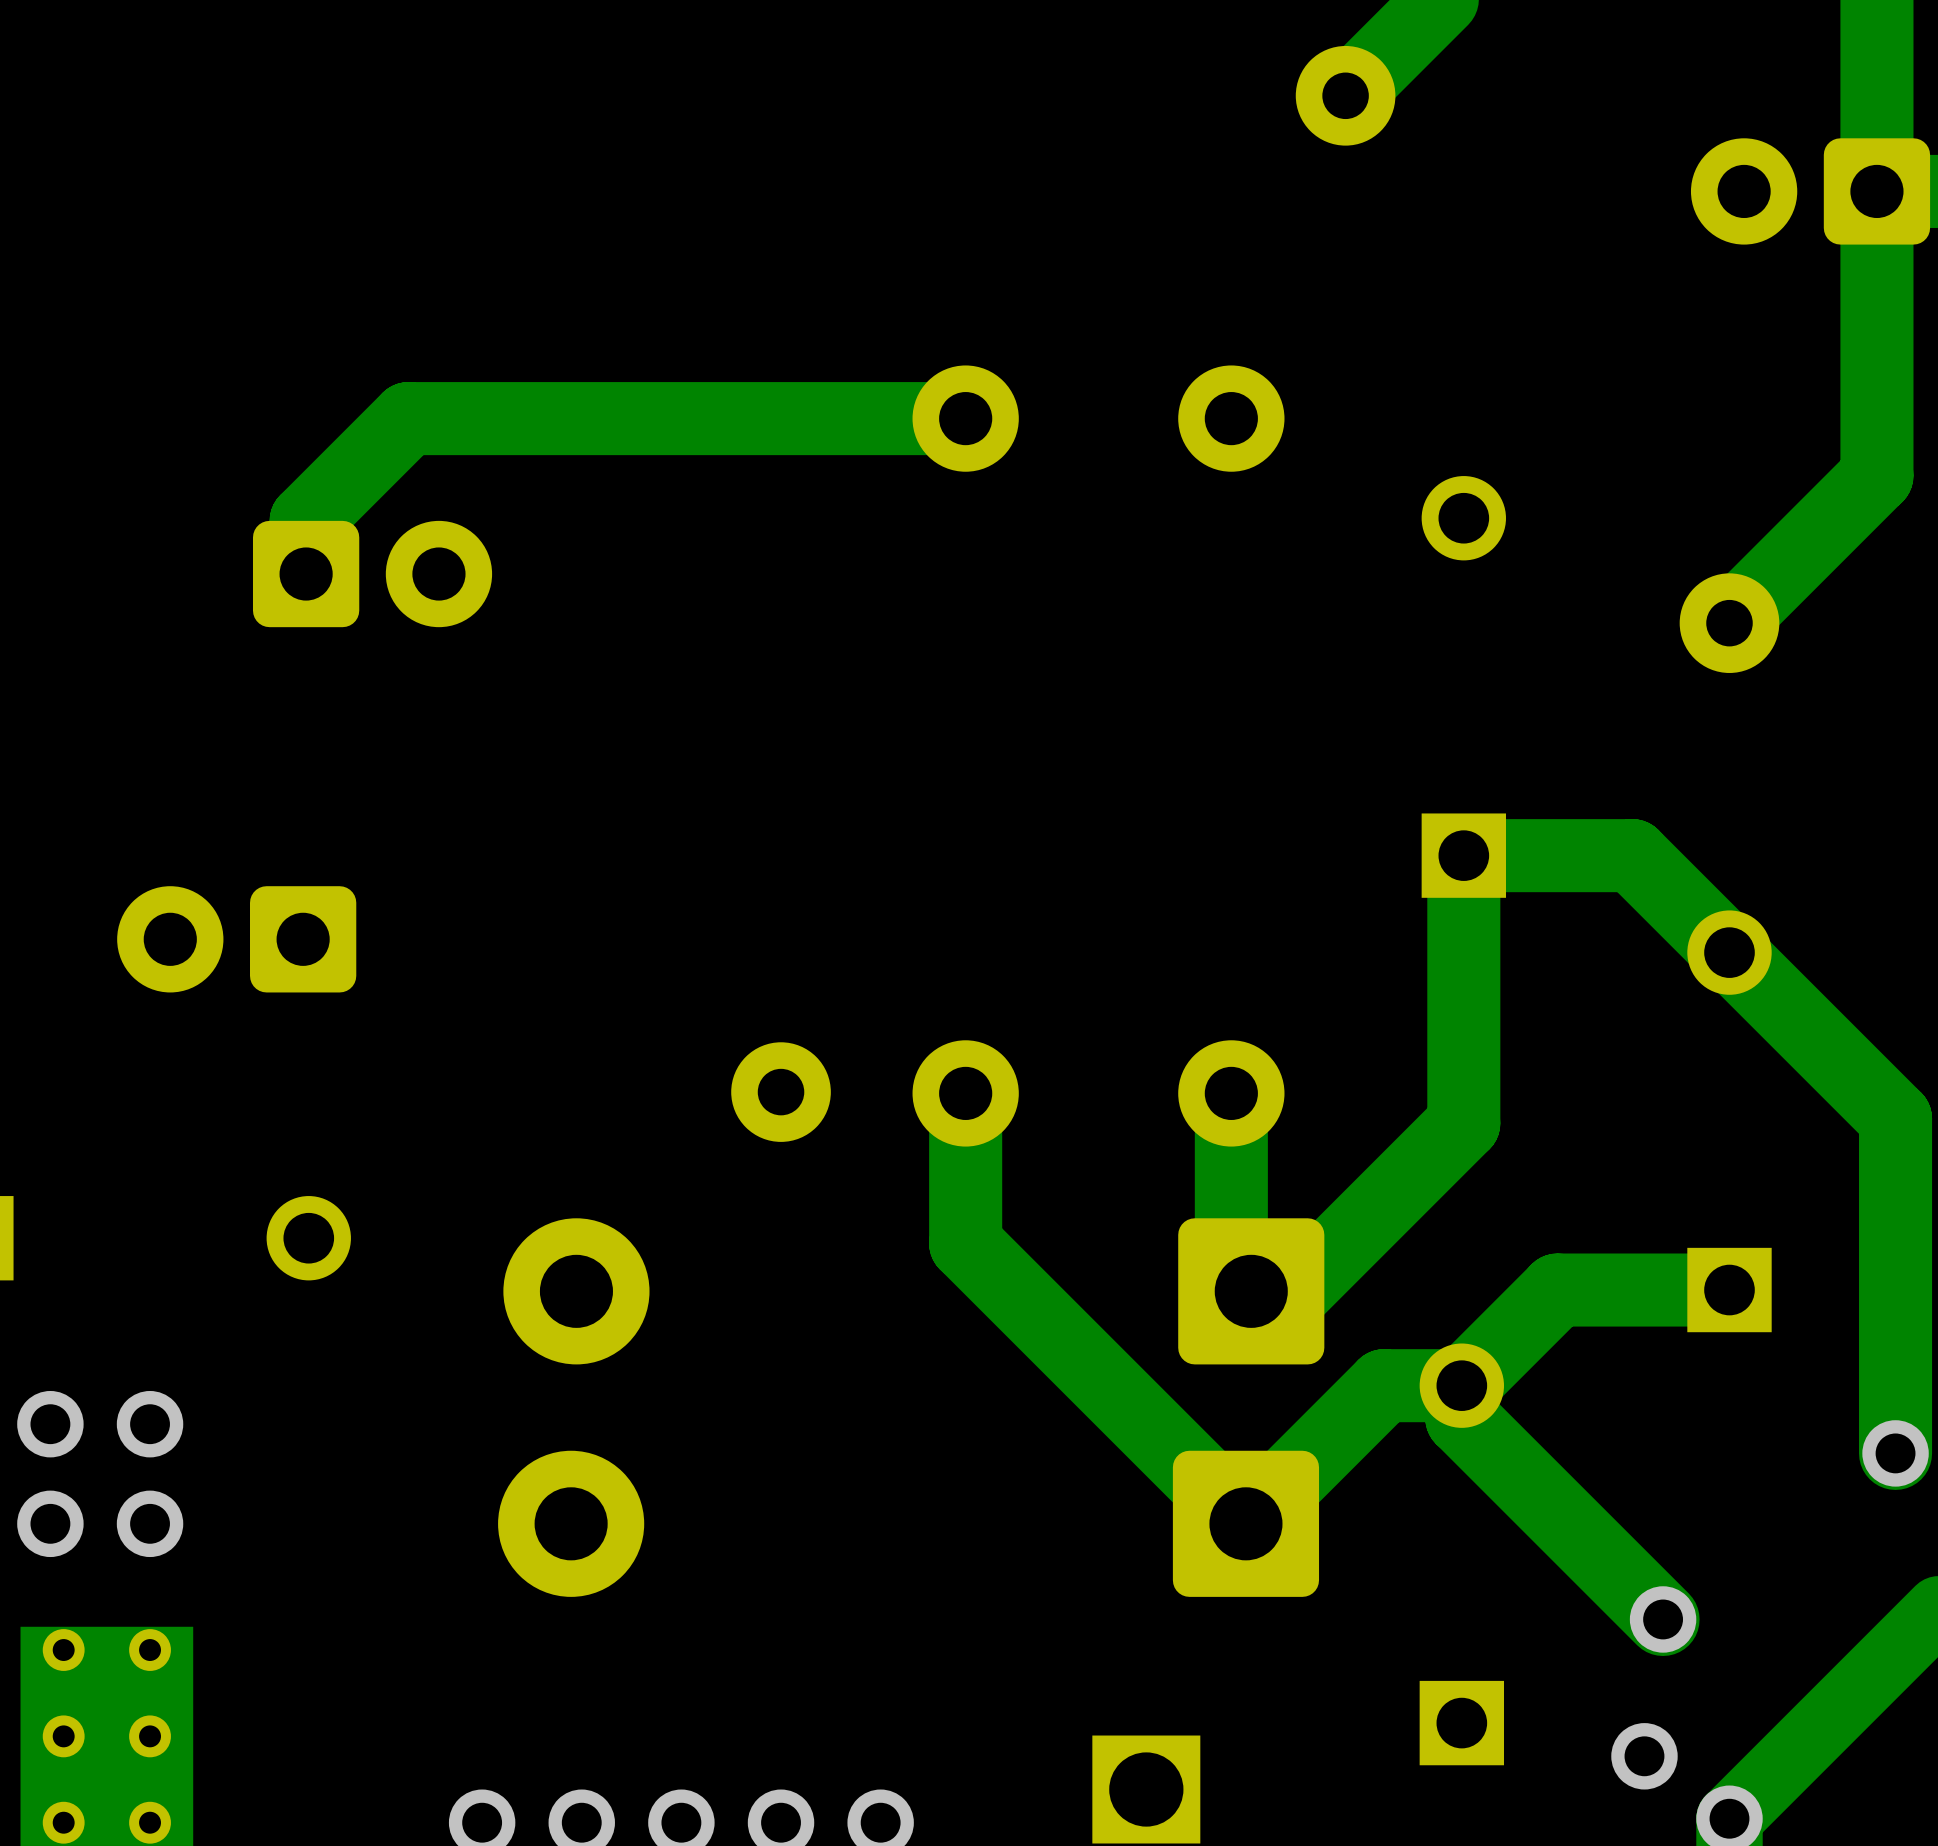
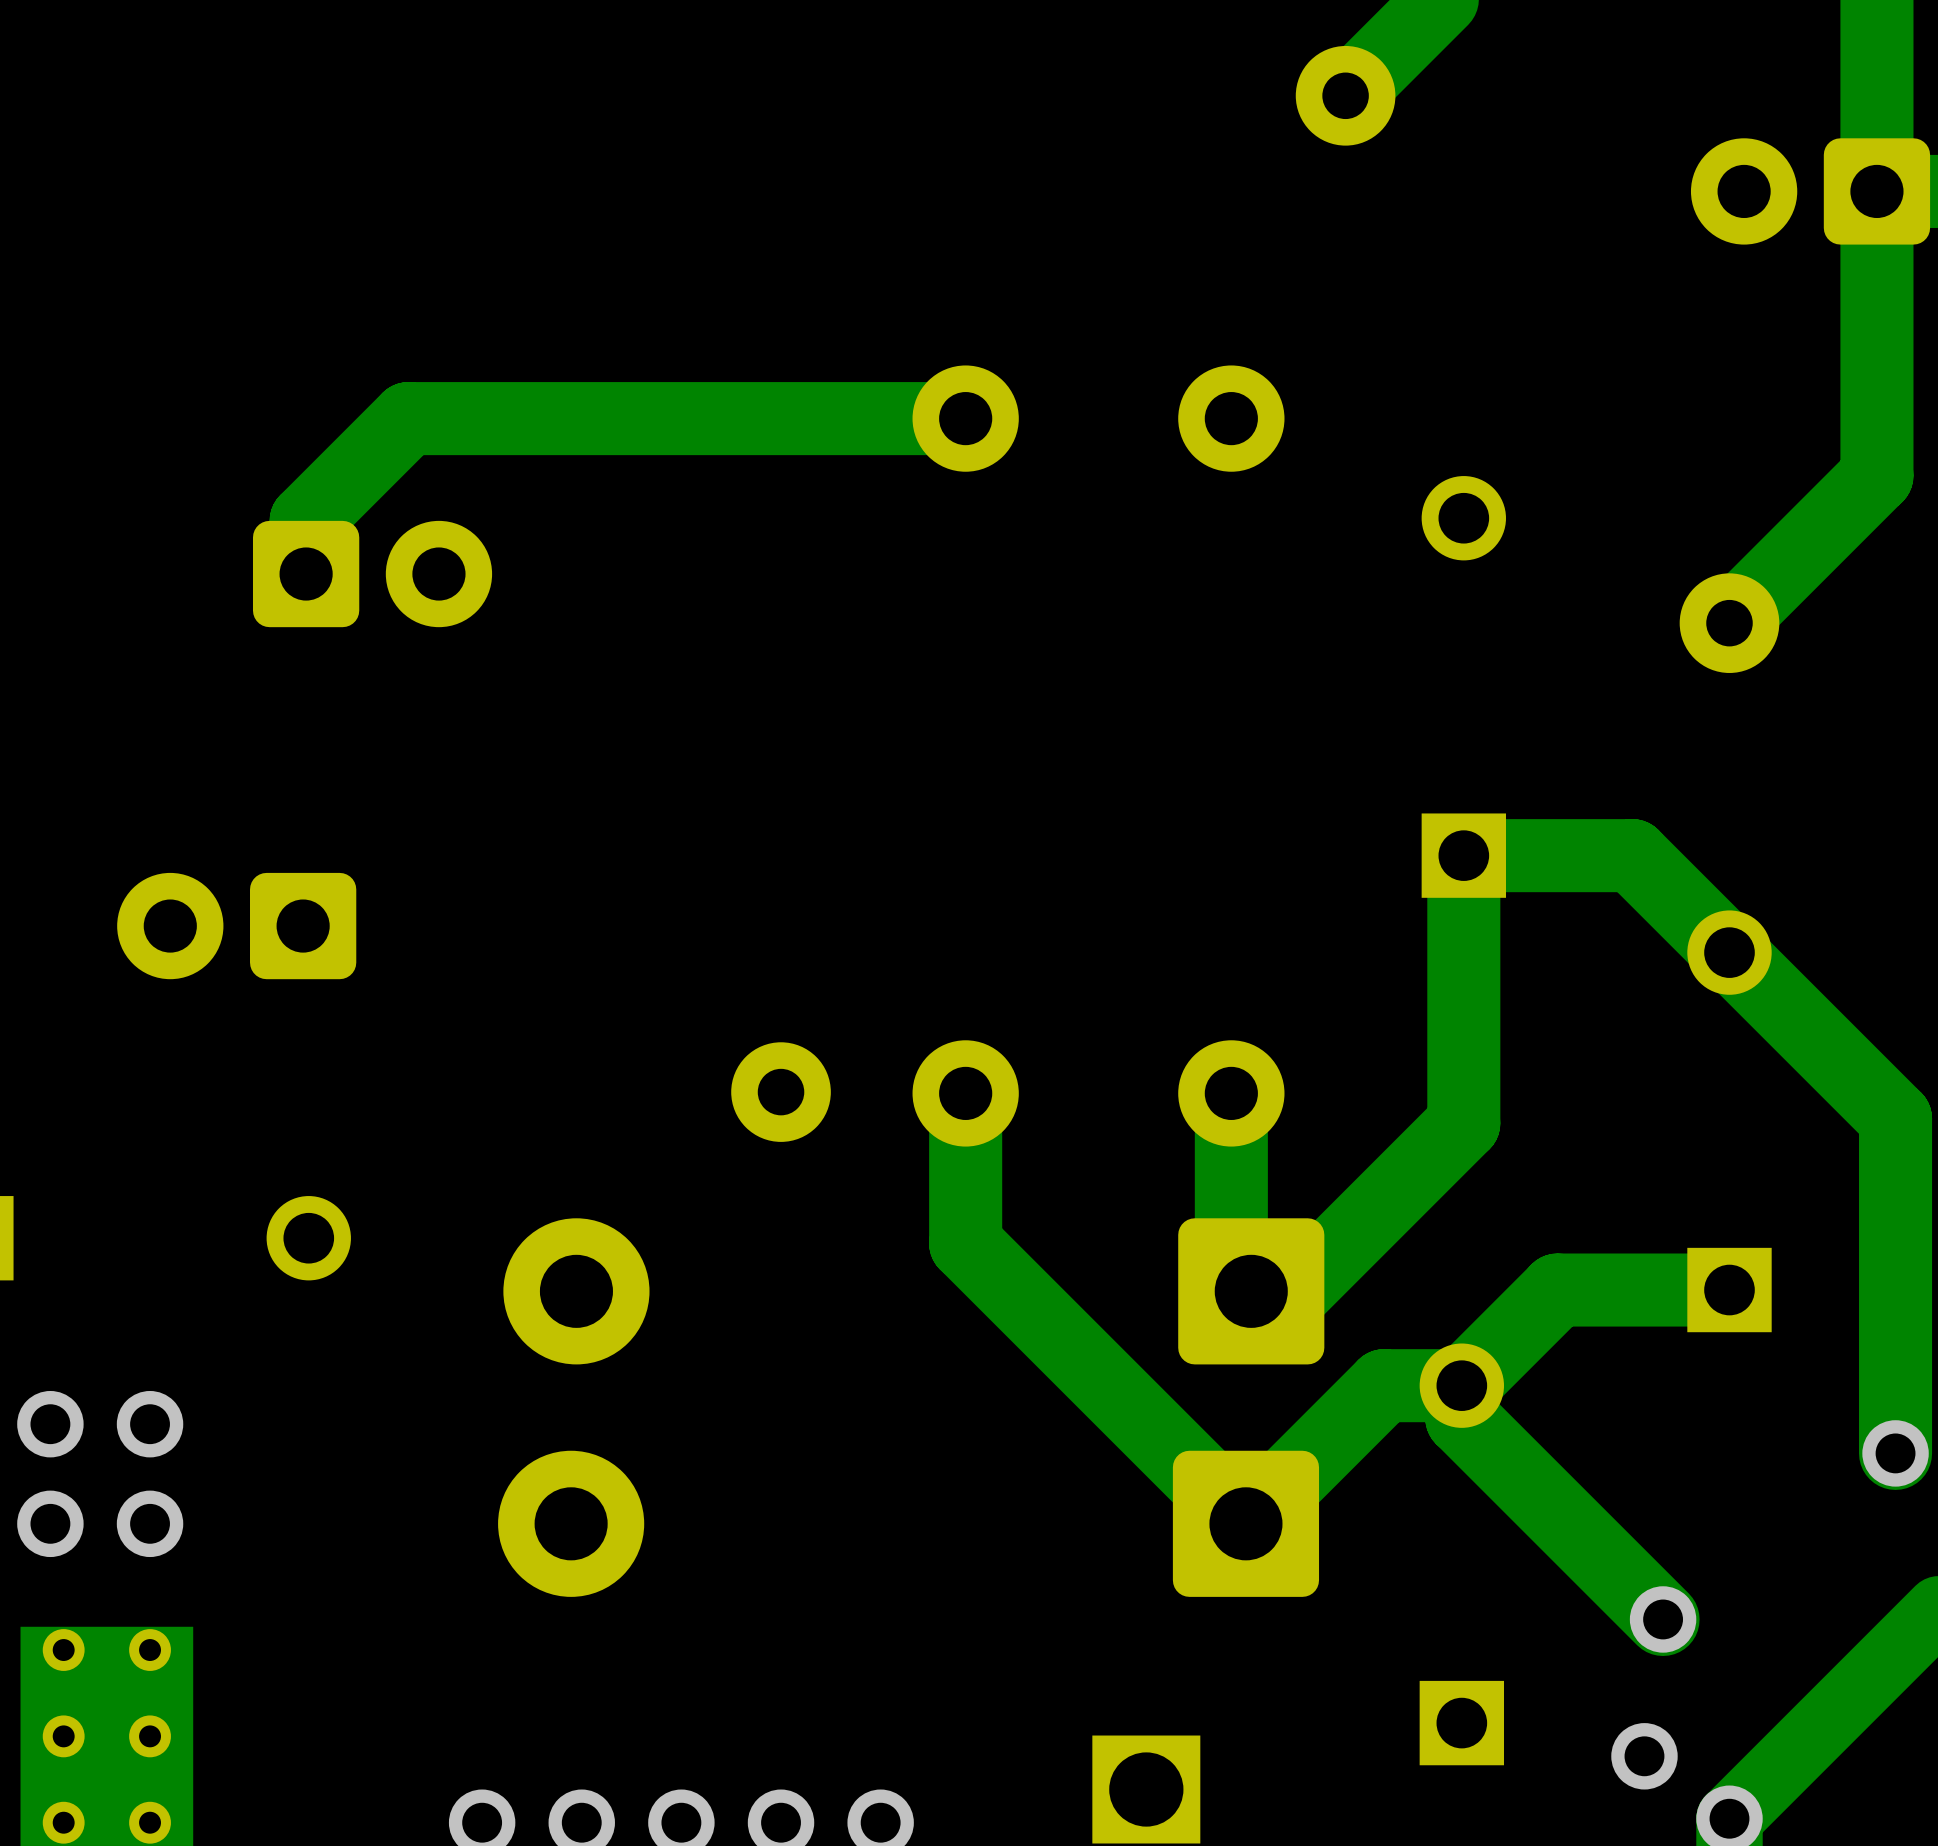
part position: (236, 939) -> (236, 926)

